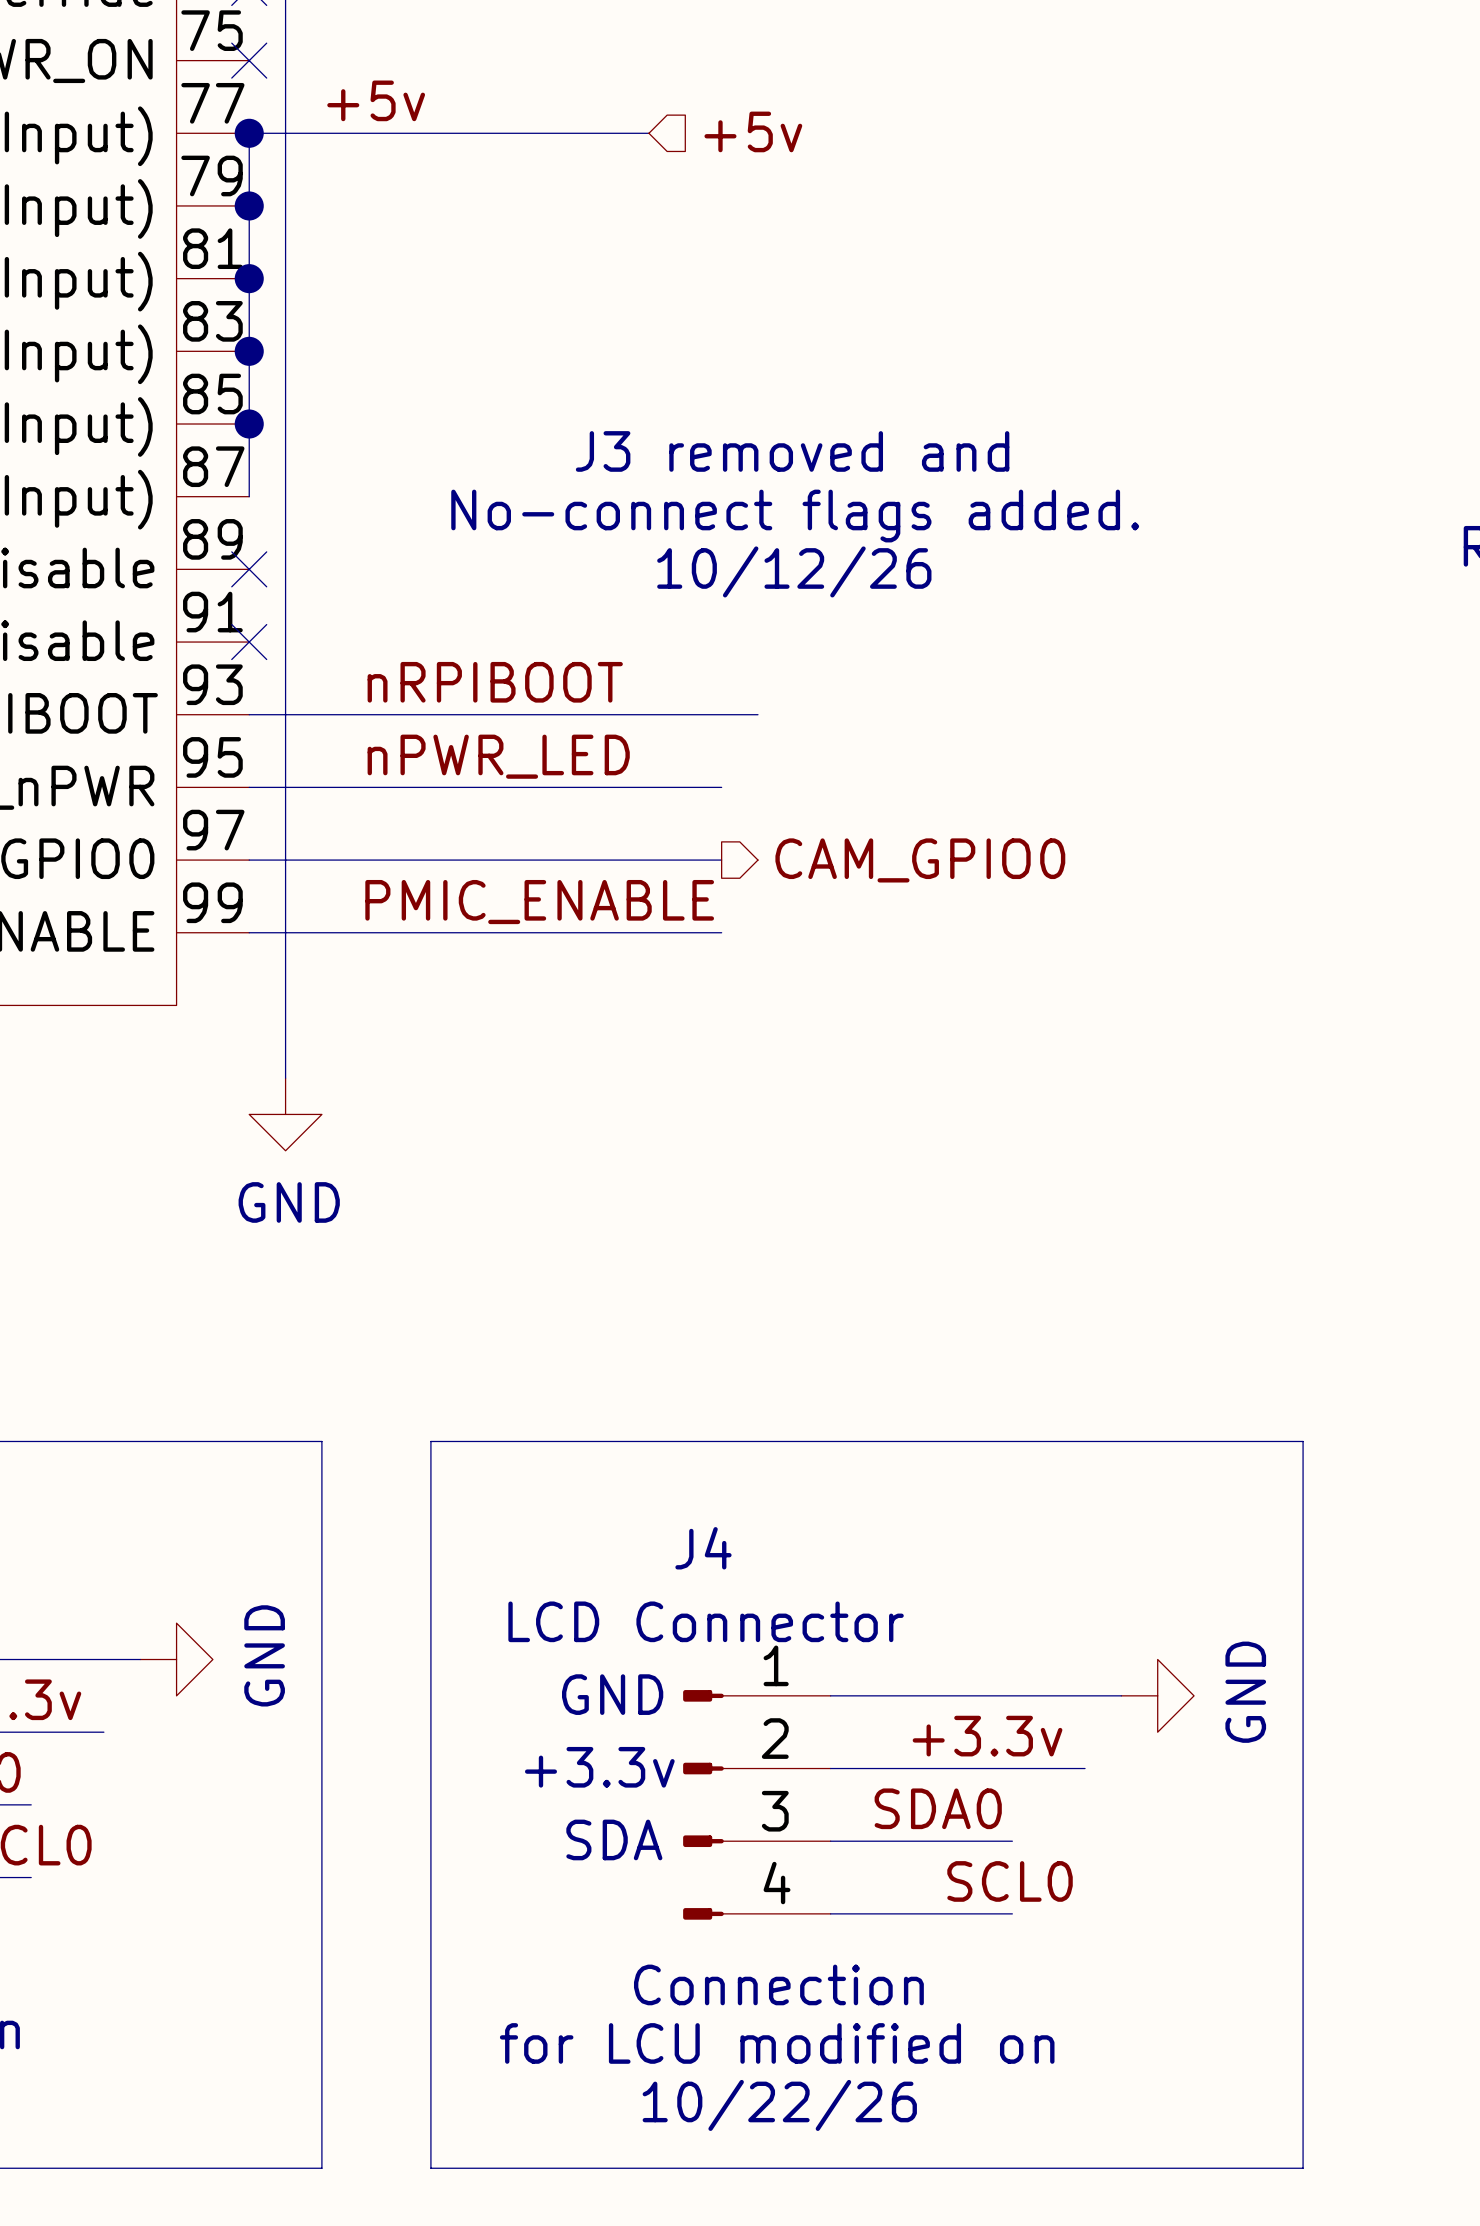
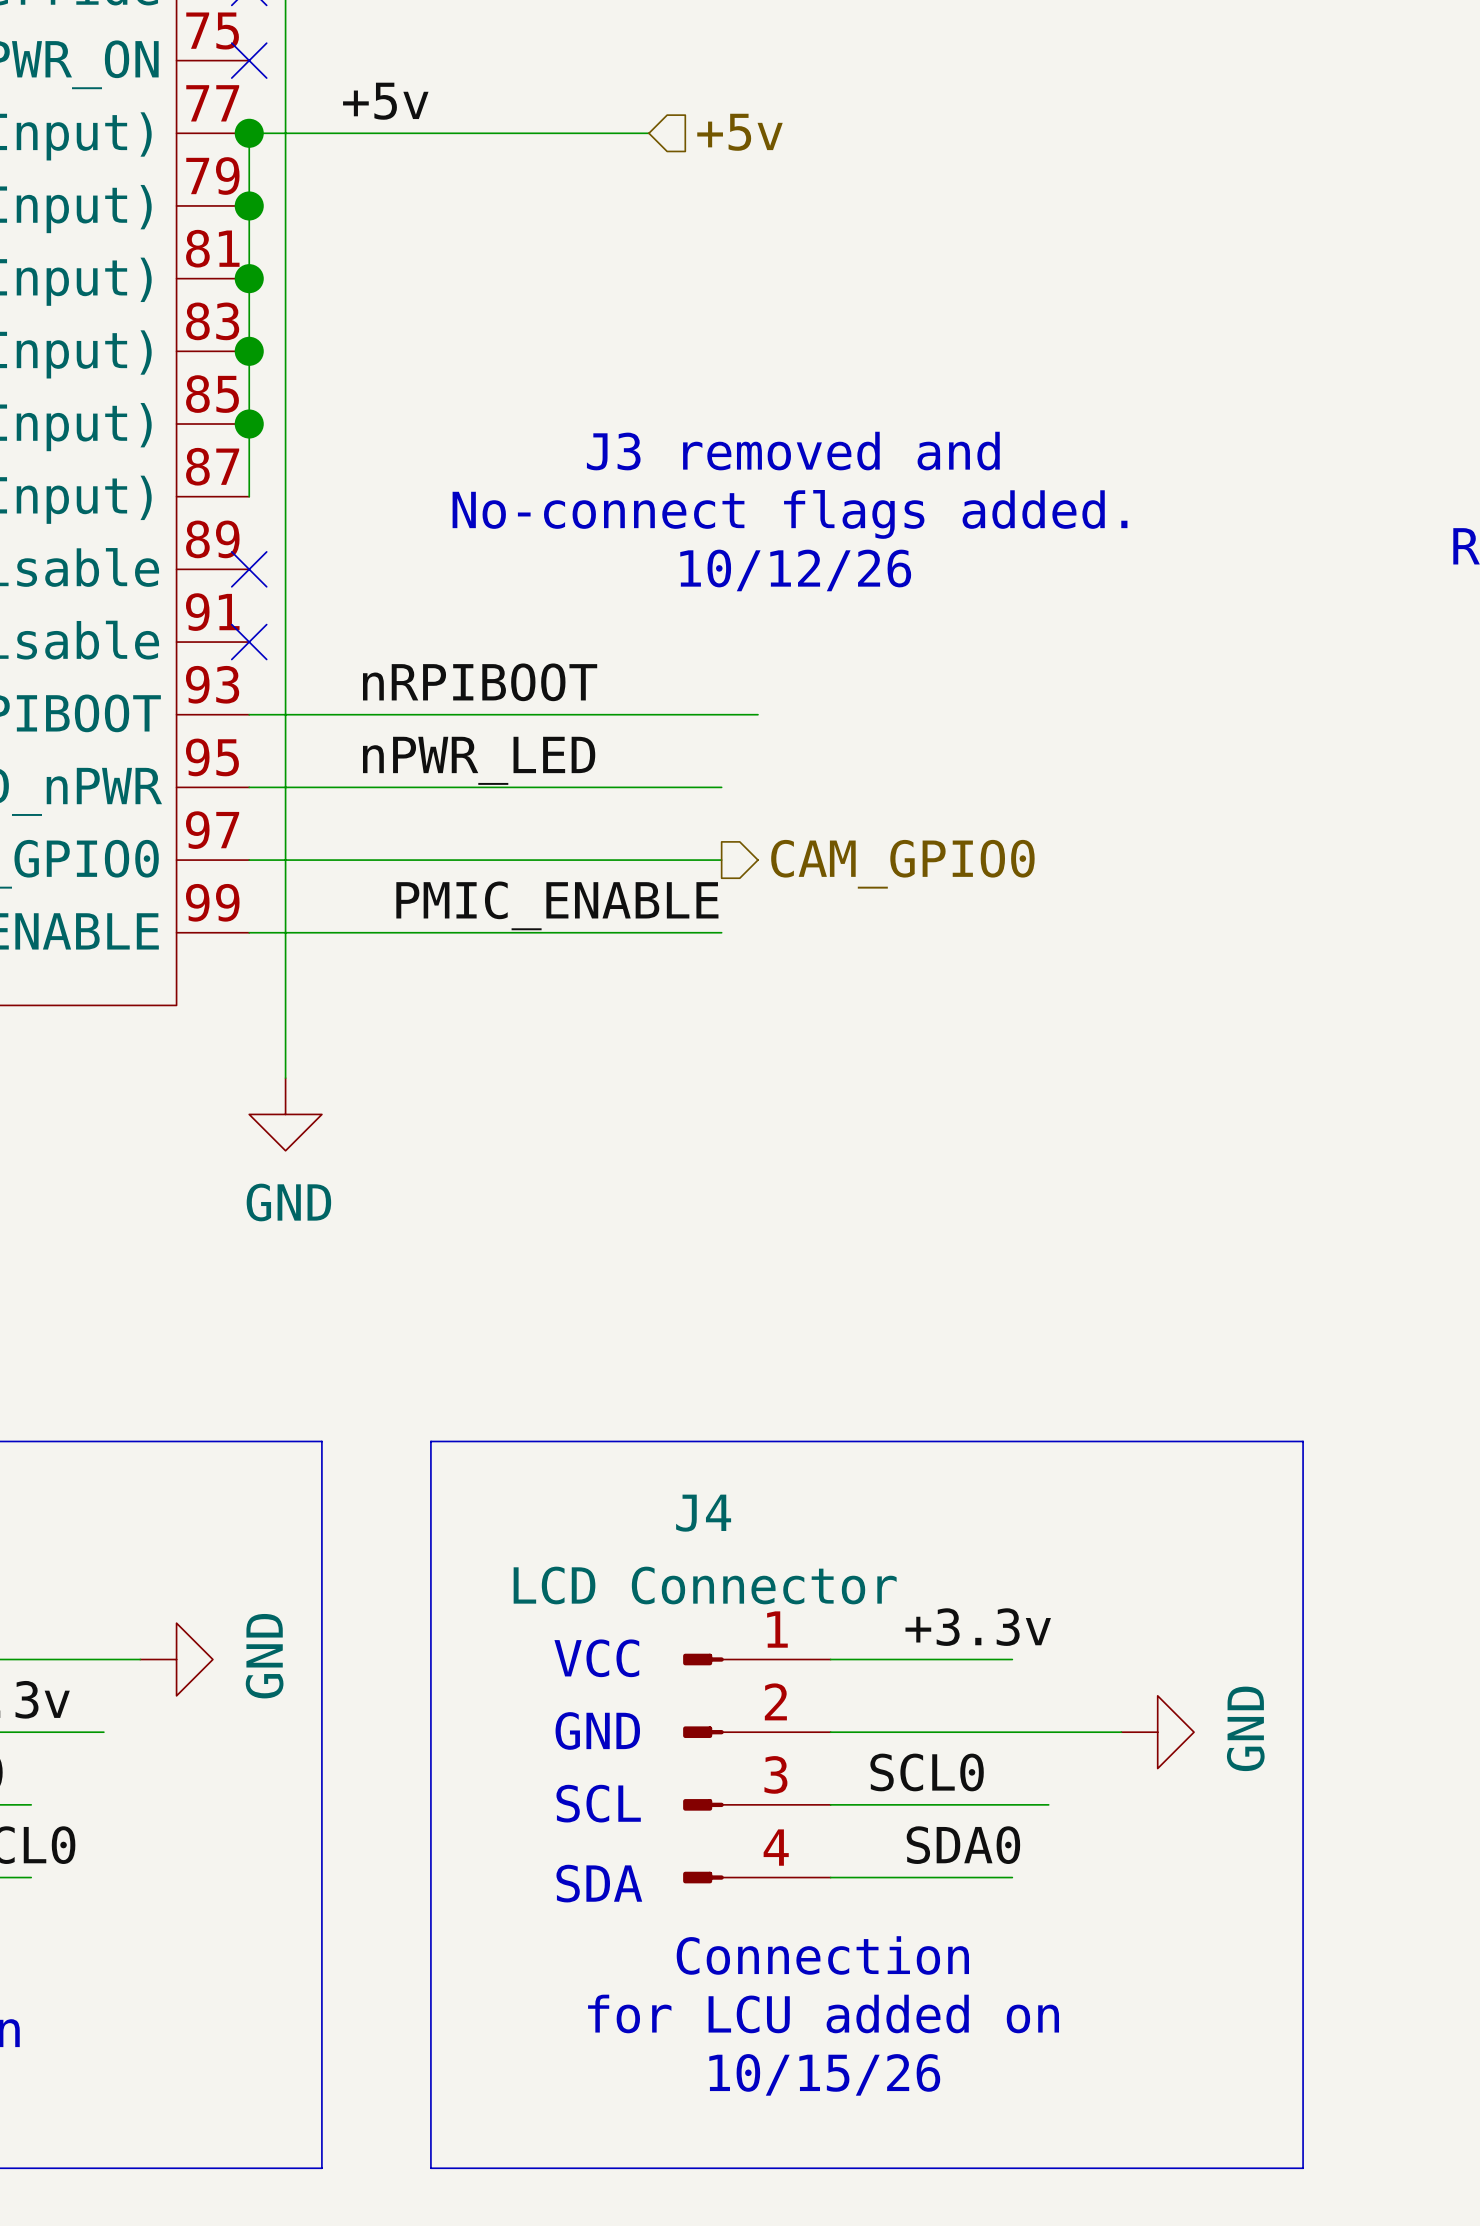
text: none -> VCC (596, 1658)
text position: GND (612, 1694) -> GND (597, 1730)
wire: (830, 1695) (1121, 1695) -> (830, 1732) (1121, 1732)
power symbol position: GND (1157, 1695) -> GND (1157, 1732)
label position: +3.3v (987, 1736) -> +3.3v (978, 1627)
text: +3.3v (599, 1767) -> none
wire: (830, 1768) (1085, 1768) -> none
text: none -> SCL (598, 1803)
J4 position: (756, 1804) -> (756, 1768)
wire: none -> (830, 1804) (1048, 1804)
label position: SDA0 (938, 1808) -> SDA0 (963, 1845)
text position: SDA (614, 1839) -> SDA (599, 1883)
wire: (830, 1841) (1012, 1841) -> (830, 1877) (1012, 1877)
label position: SCL0 (1010, 1881) -> SCL0 (927, 1772)
wire: (830, 1913) (1012, 1913) -> (830, 1659) (1012, 1659)
text position: Connection (778, 1984) -> Connection (822, 1955)
text: for LCU modified on (777, 2043) -> for LCU added on (823, 2013)
text: 10/22/26 (779, 2105) -> 10/15/26 (824, 2074)

